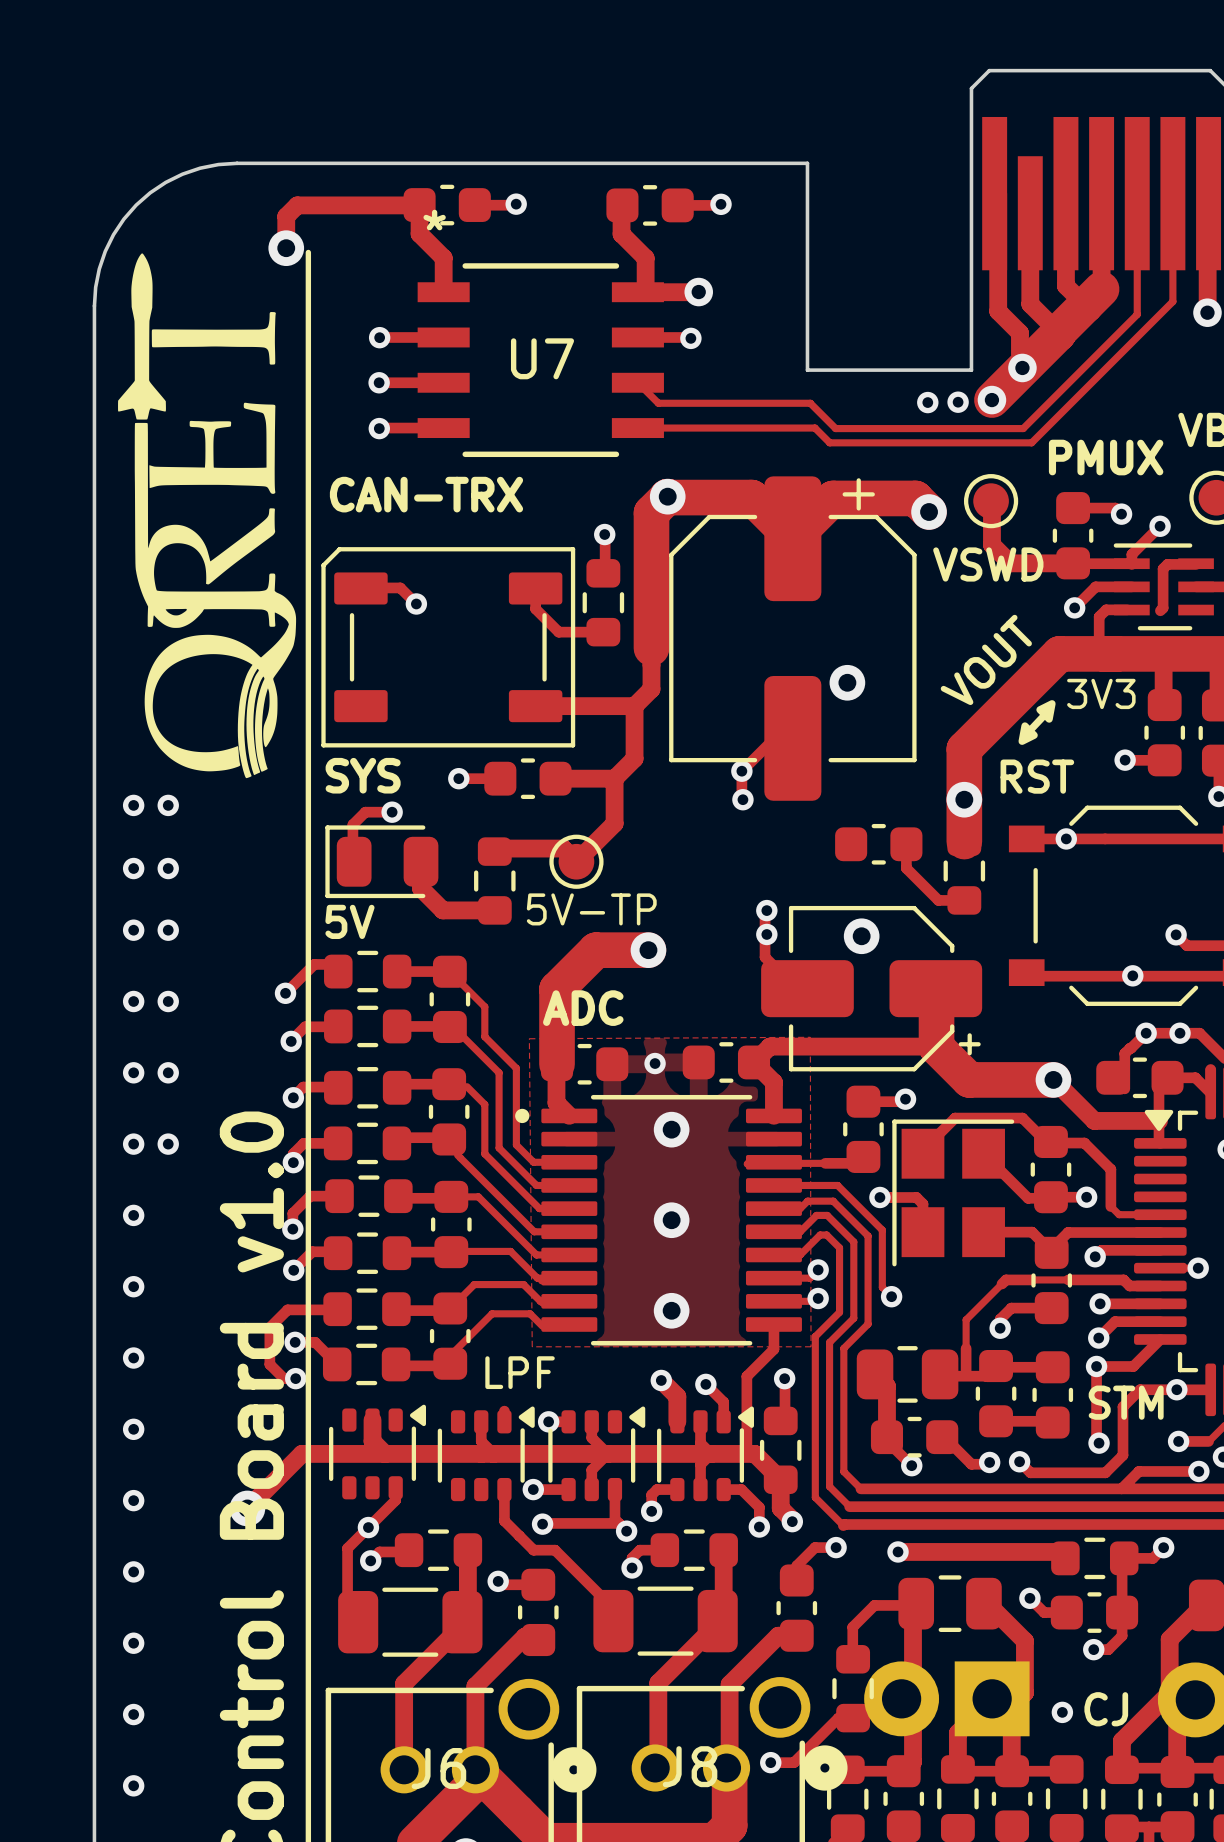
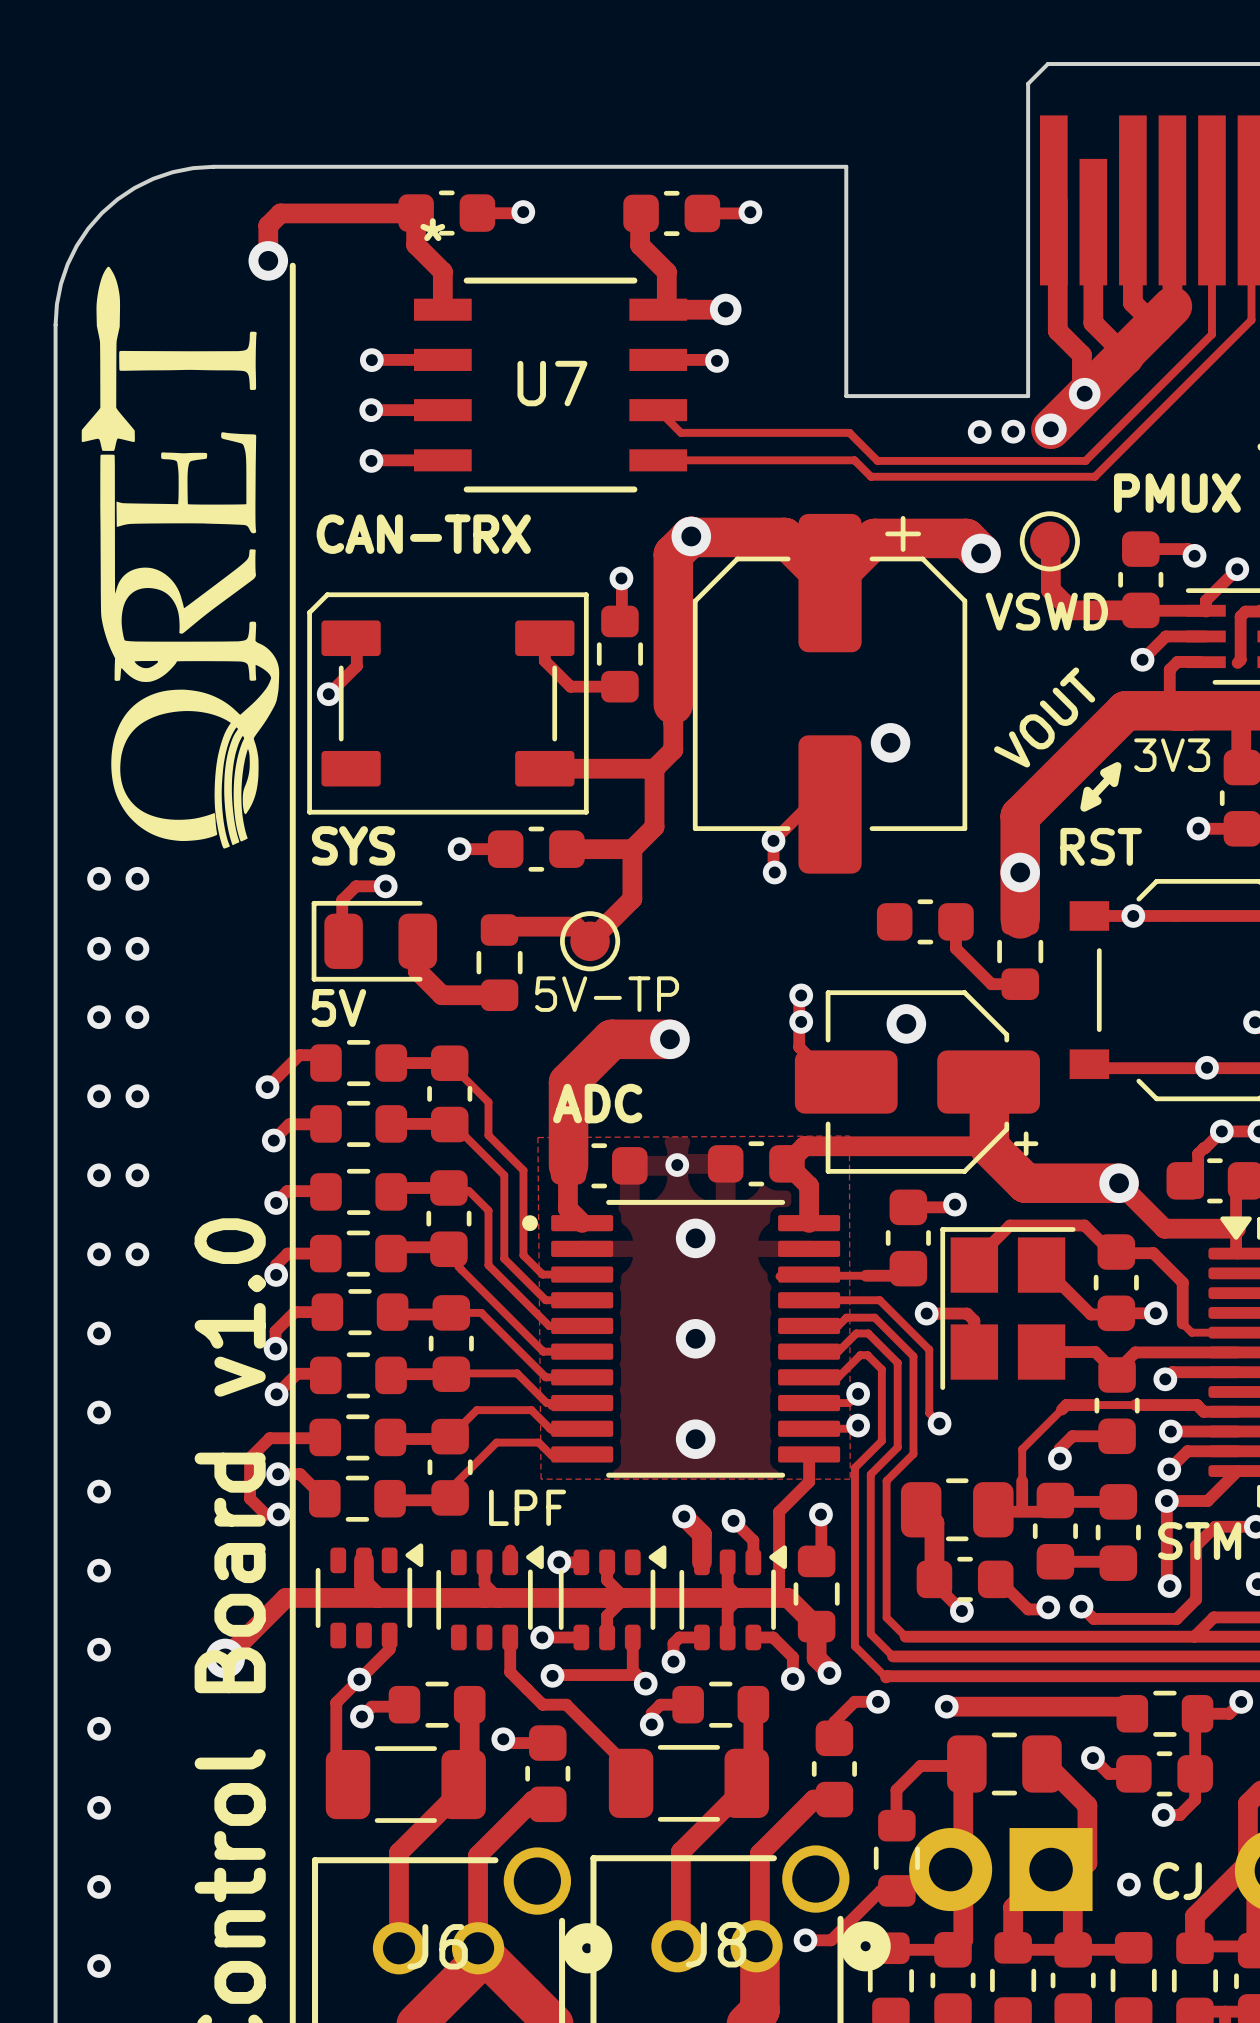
track: (366, 587) (400, 587) (416, 603) -> (356, 637) (356, 666) (328, 694)
via position: (416, 603) -> (328, 694)

